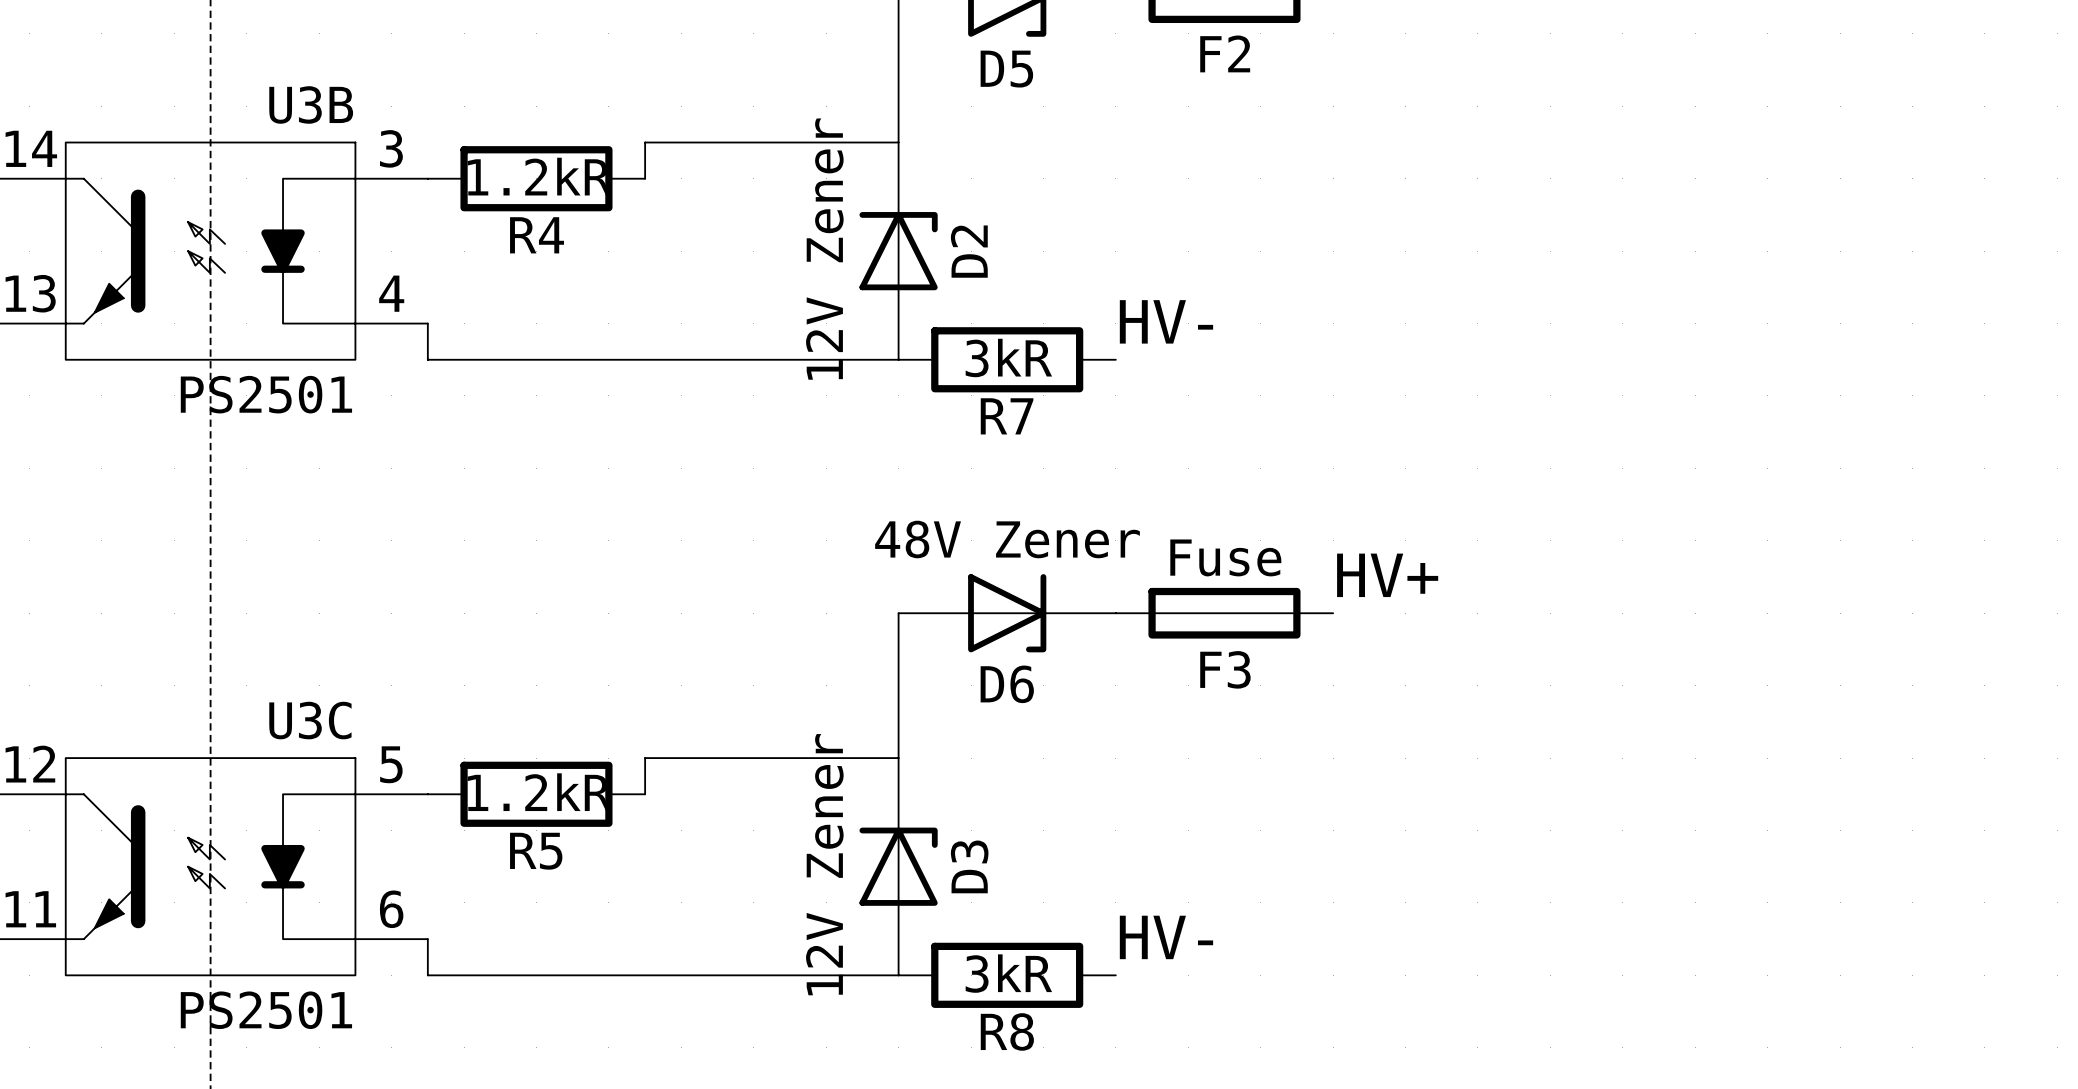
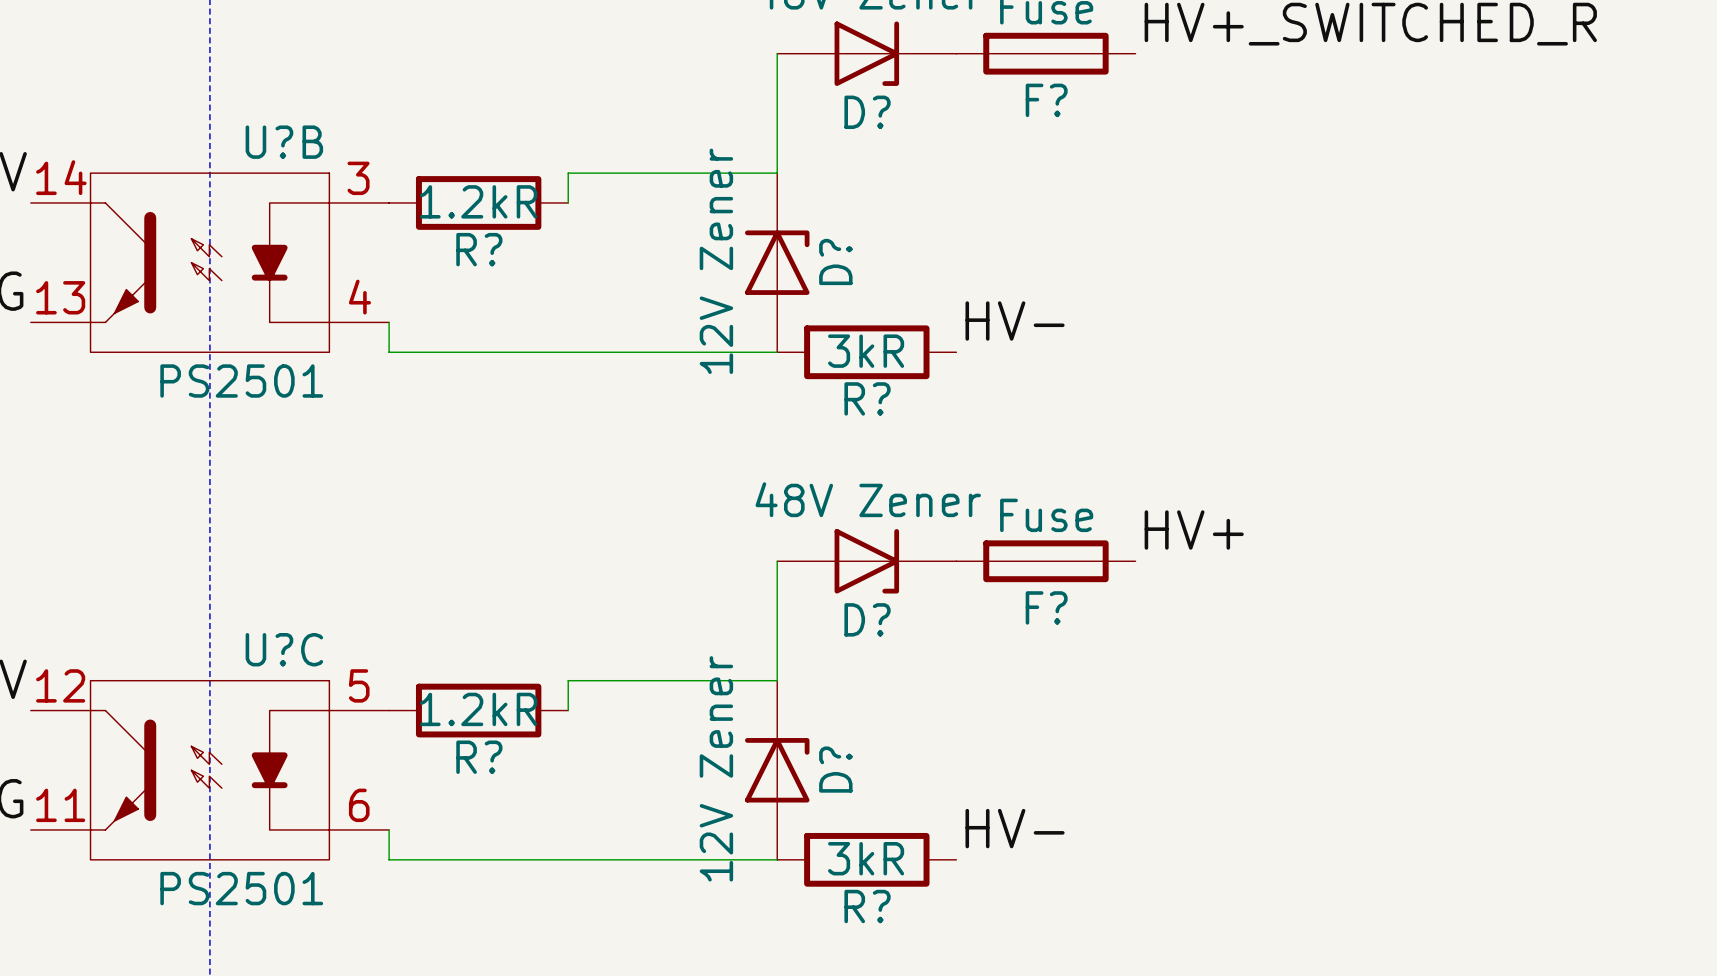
F2 name: F2 (1225, 53) -> F? (1046, 100)
D5 name: D5 (1006, 69) -> D? (867, 112)
U3B name: U3B (311, 104) -> U?B (284, 142)
R4 name: R4 (537, 235) -> R? (479, 249)
D2 name: D2 (969, 251) -> D? (835, 261)
R7 name: R7 (1007, 416) -> R? (867, 398)
F3 name: F3 (1225, 669) -> F? (1046, 607)
D6 name: D6 (1007, 684) -> D? (867, 619)
U3C name: U3C (310, 720) -> U?C (284, 649)
R5 name: R5 (536, 851) -> R? (479, 757)
D3 name: D3 (969, 866) -> D? (835, 769)
R8 name: R8 (1007, 1031) -> R? (867, 906)

